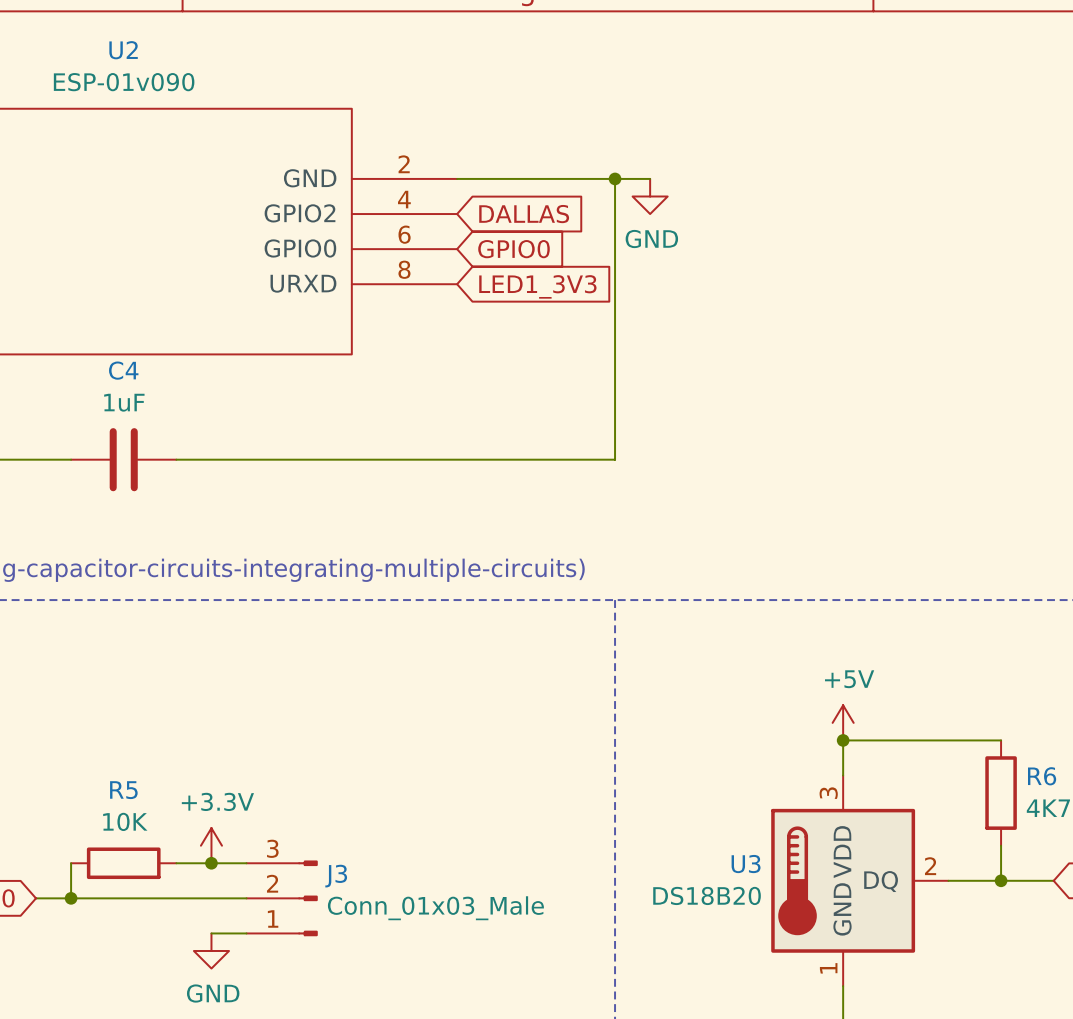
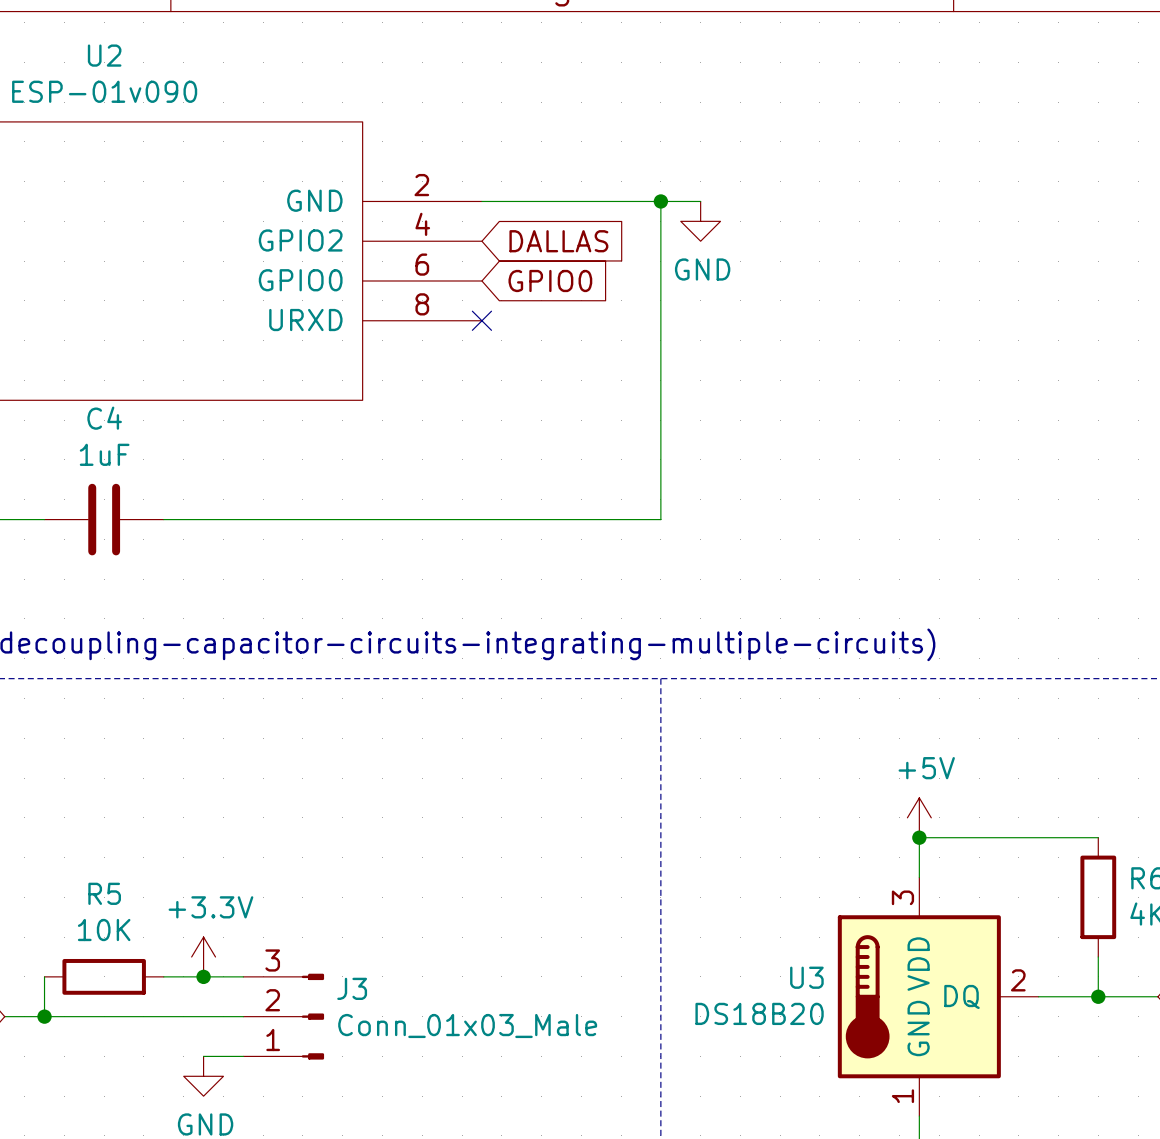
no-connect mark: none -> (481, 320)
global label: LED1_3V3 (537, 286) -> none

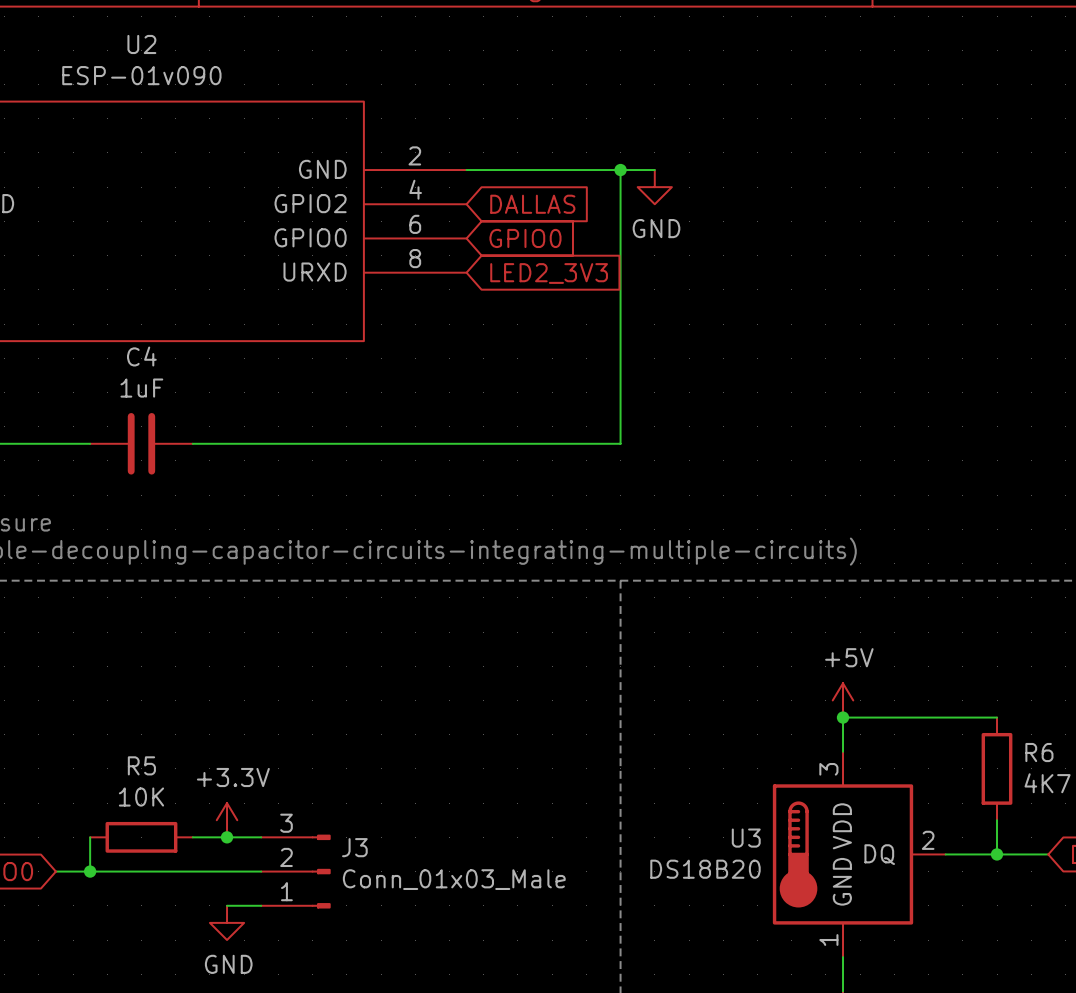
no-connect mark: (481, 320) -> none
global label: none -> LED2_3V3 (549, 273)

